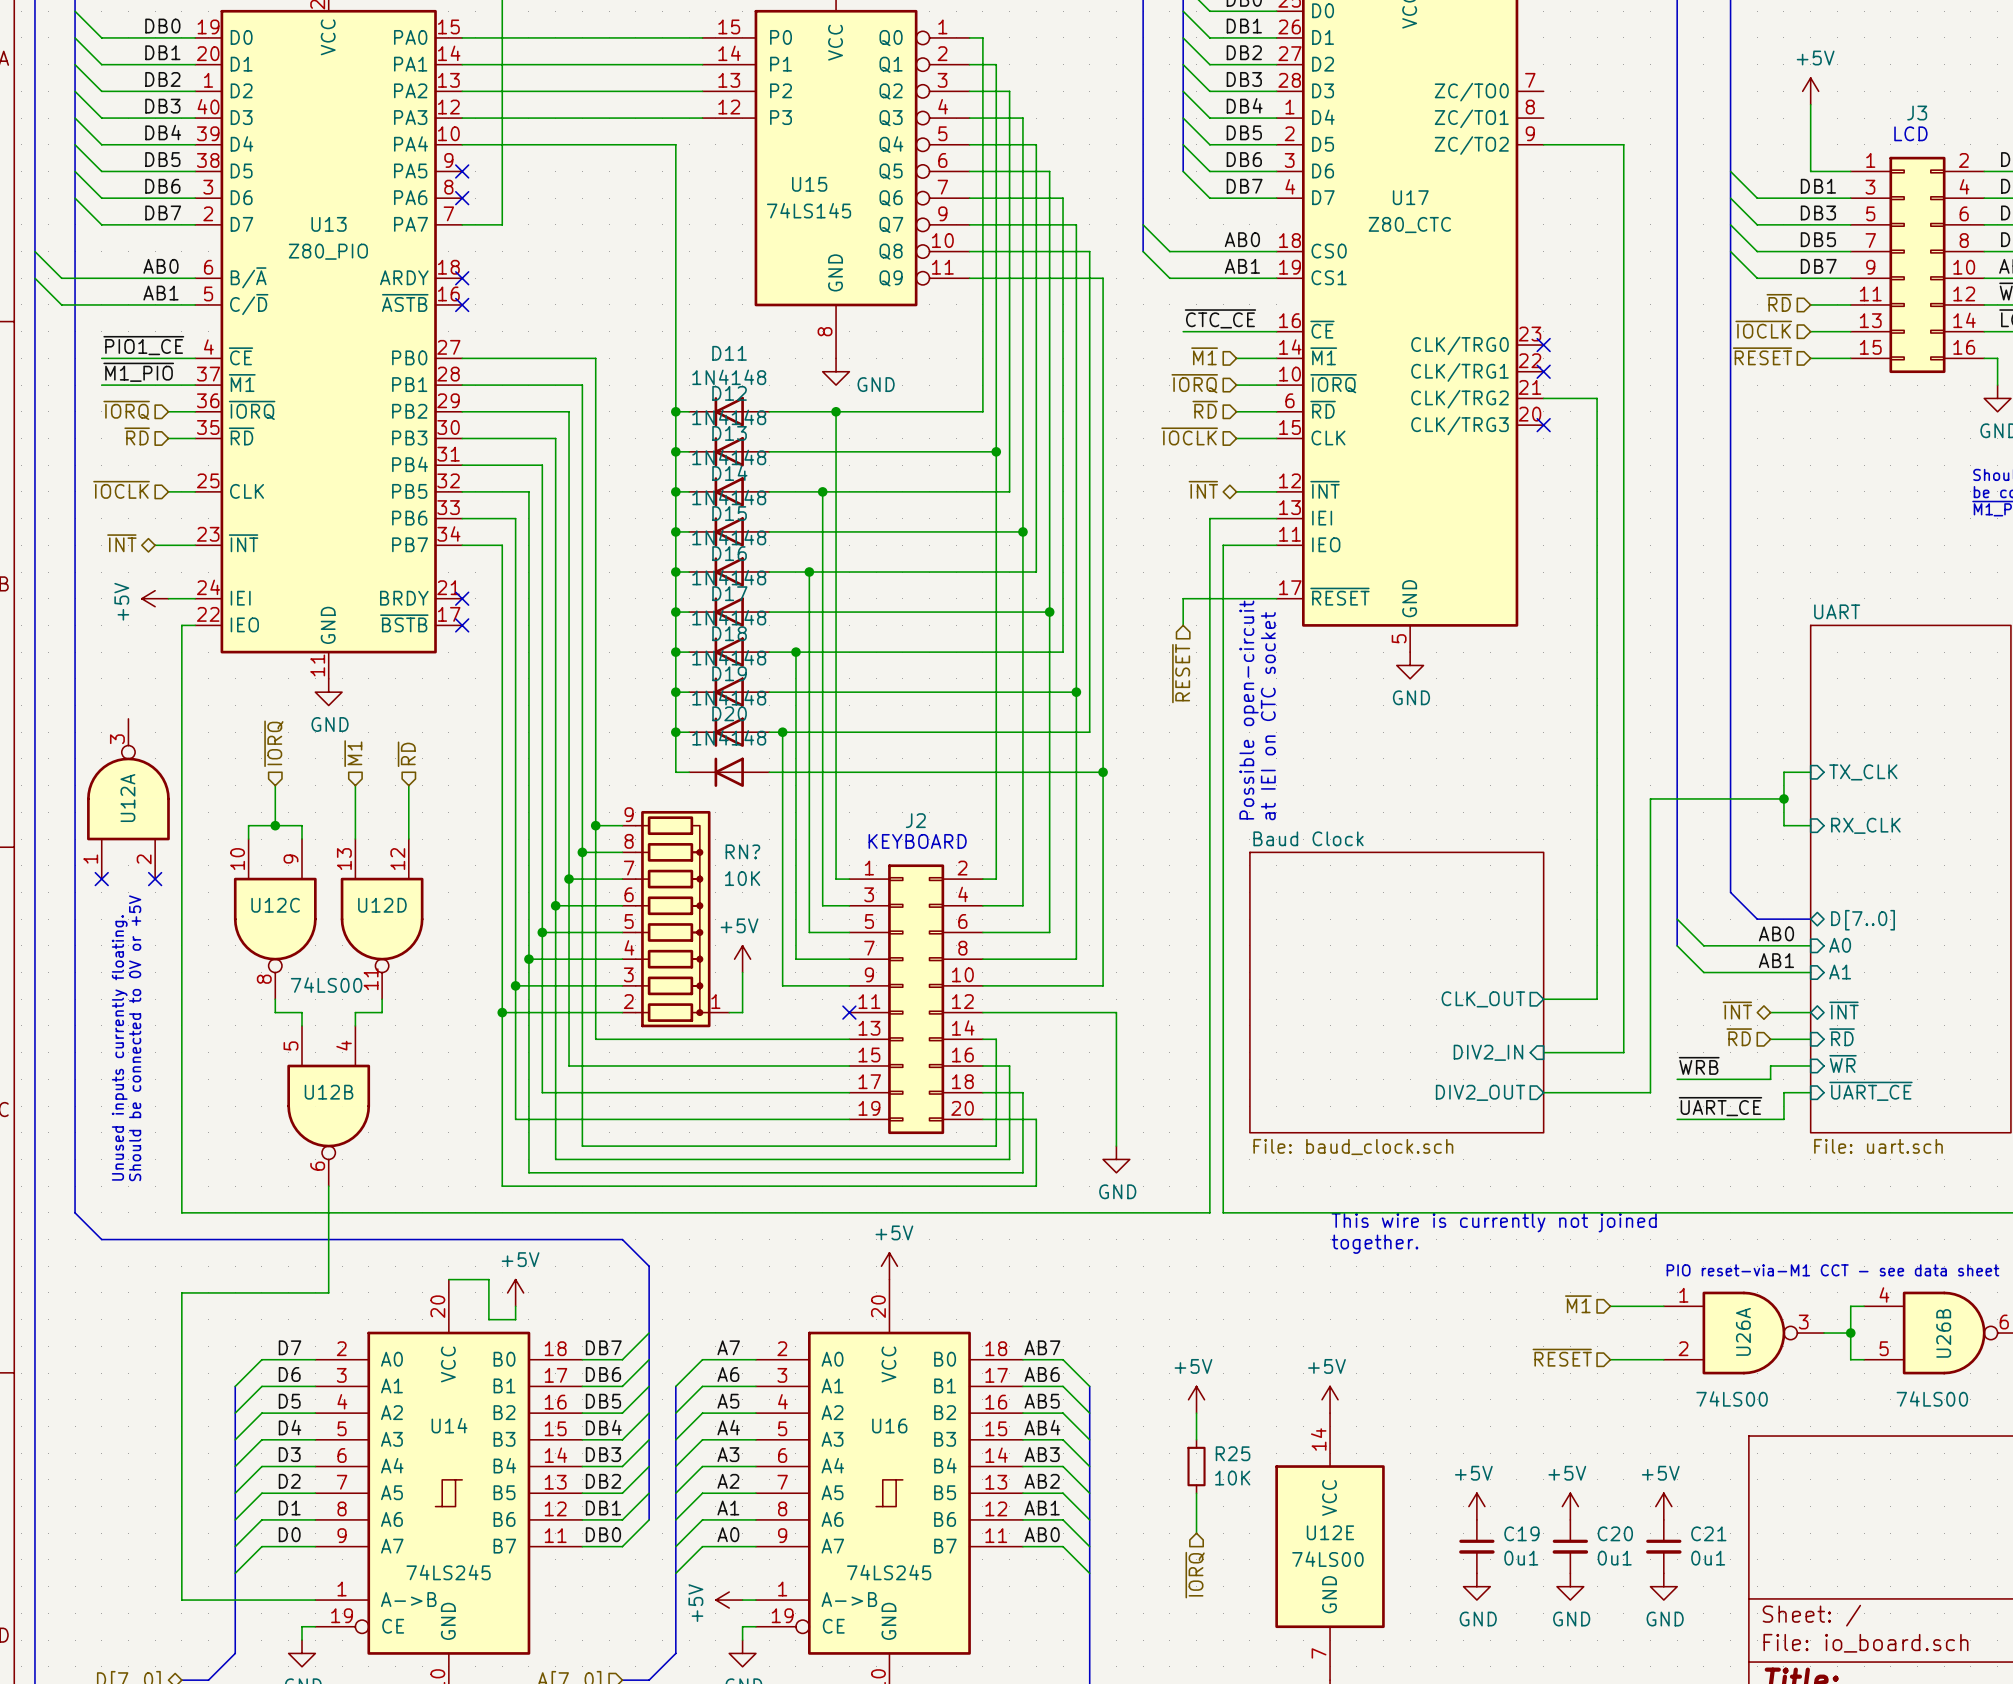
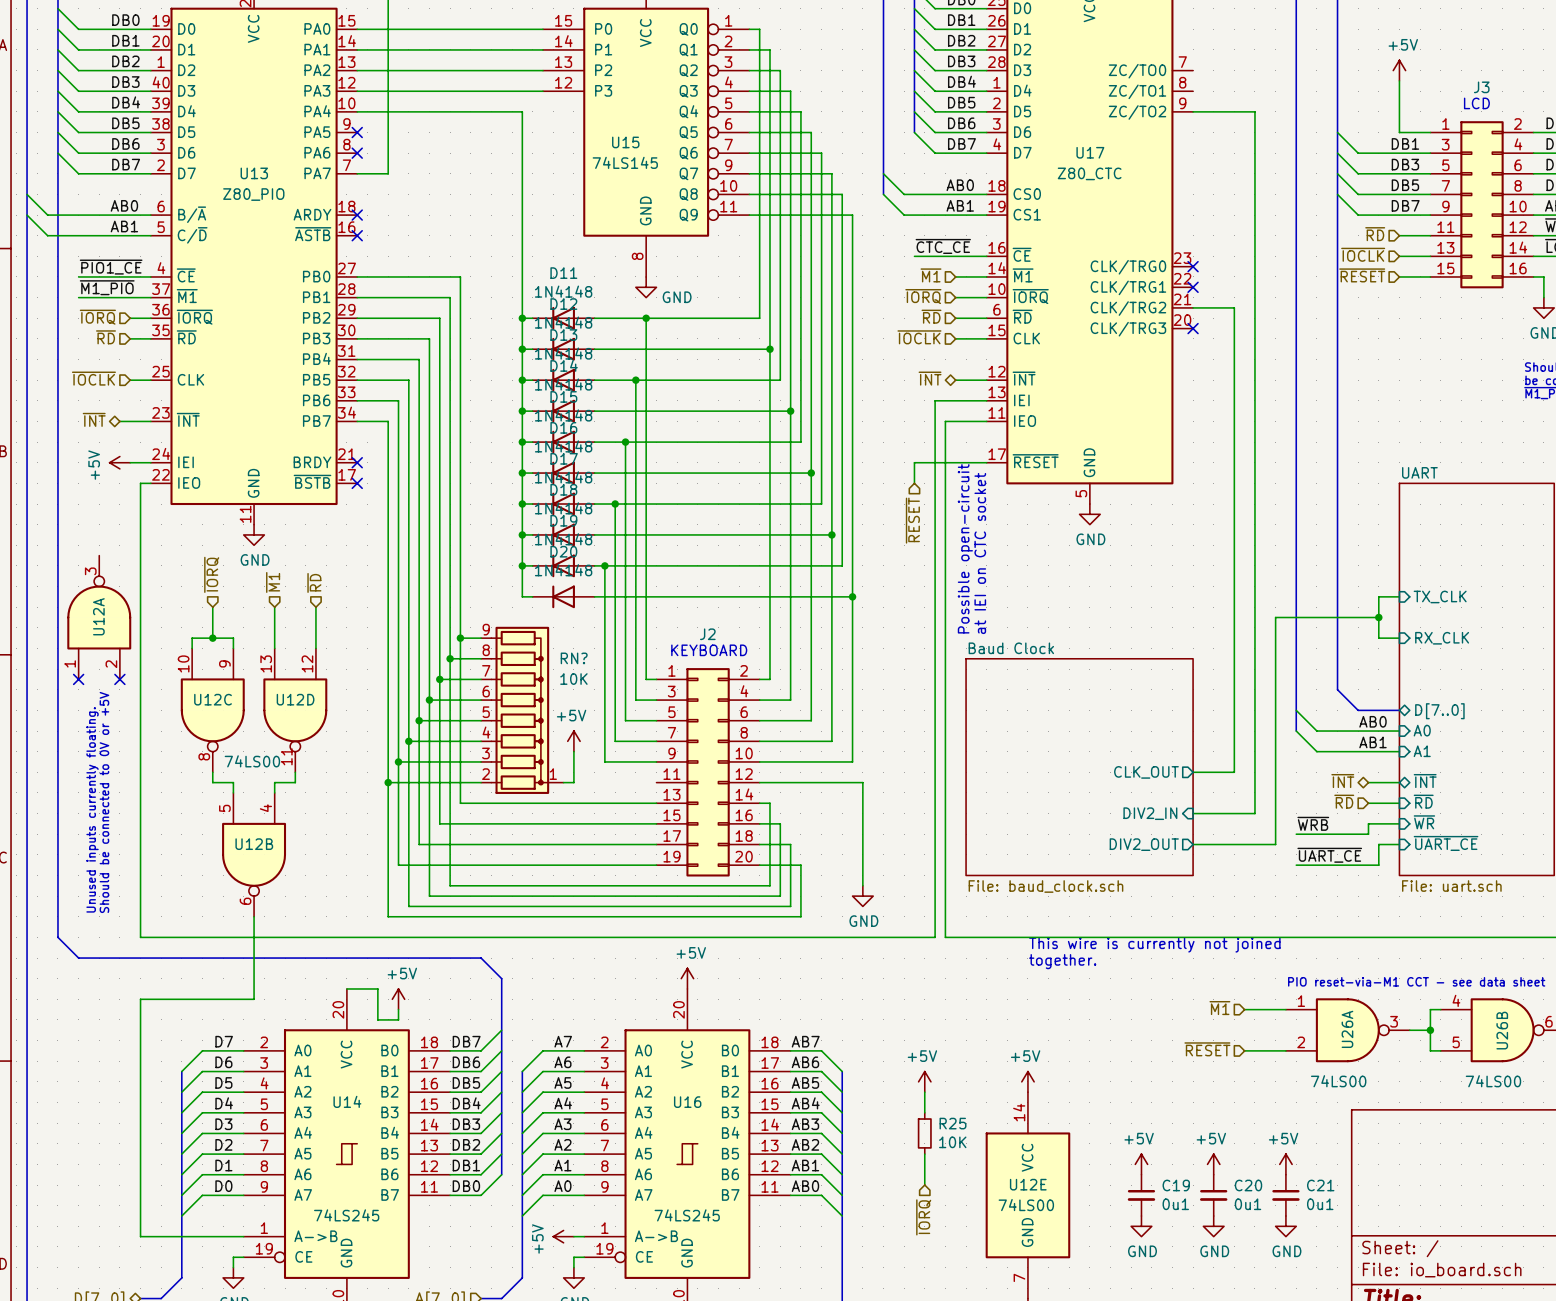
no-connect mark: (849, 1012) -> none

